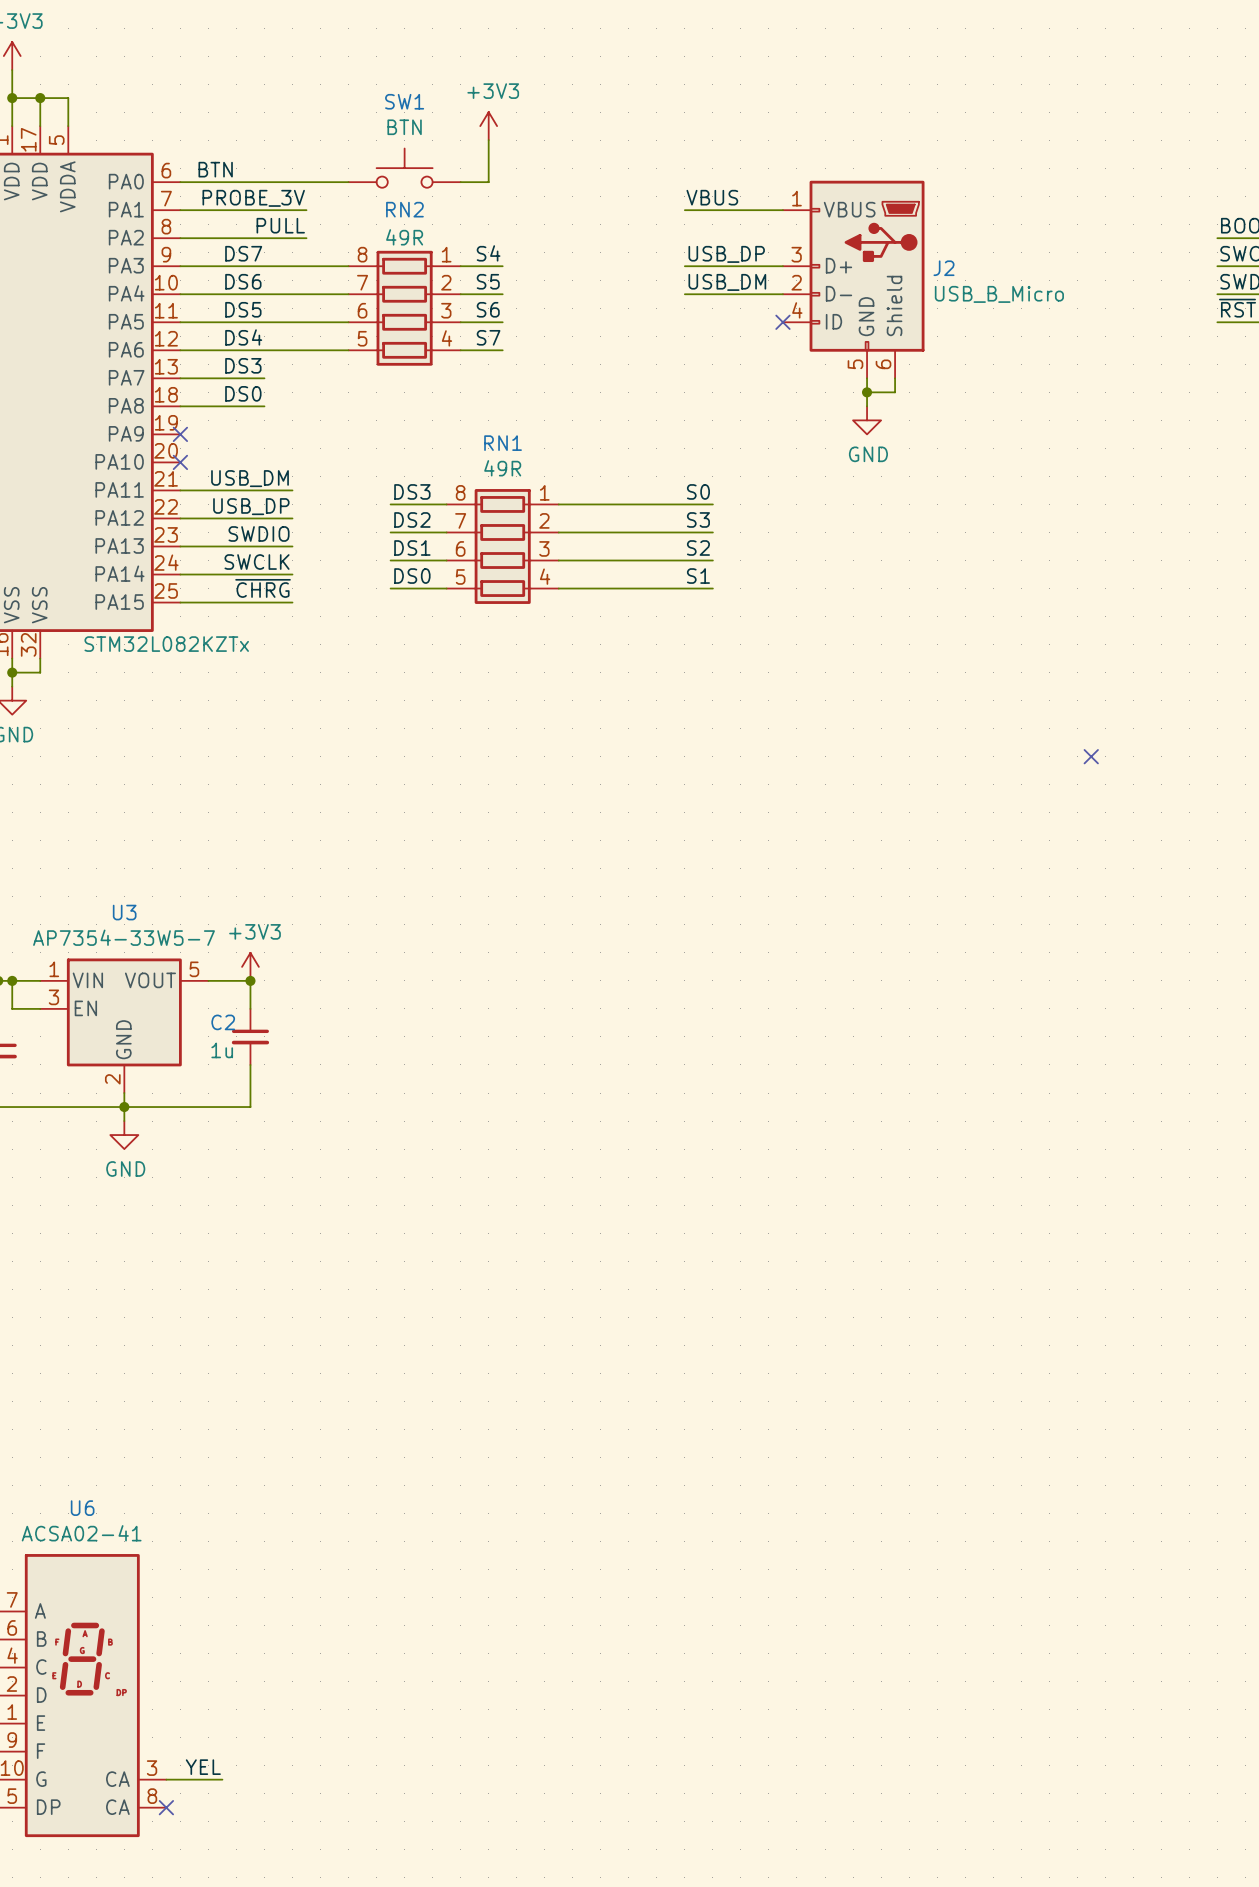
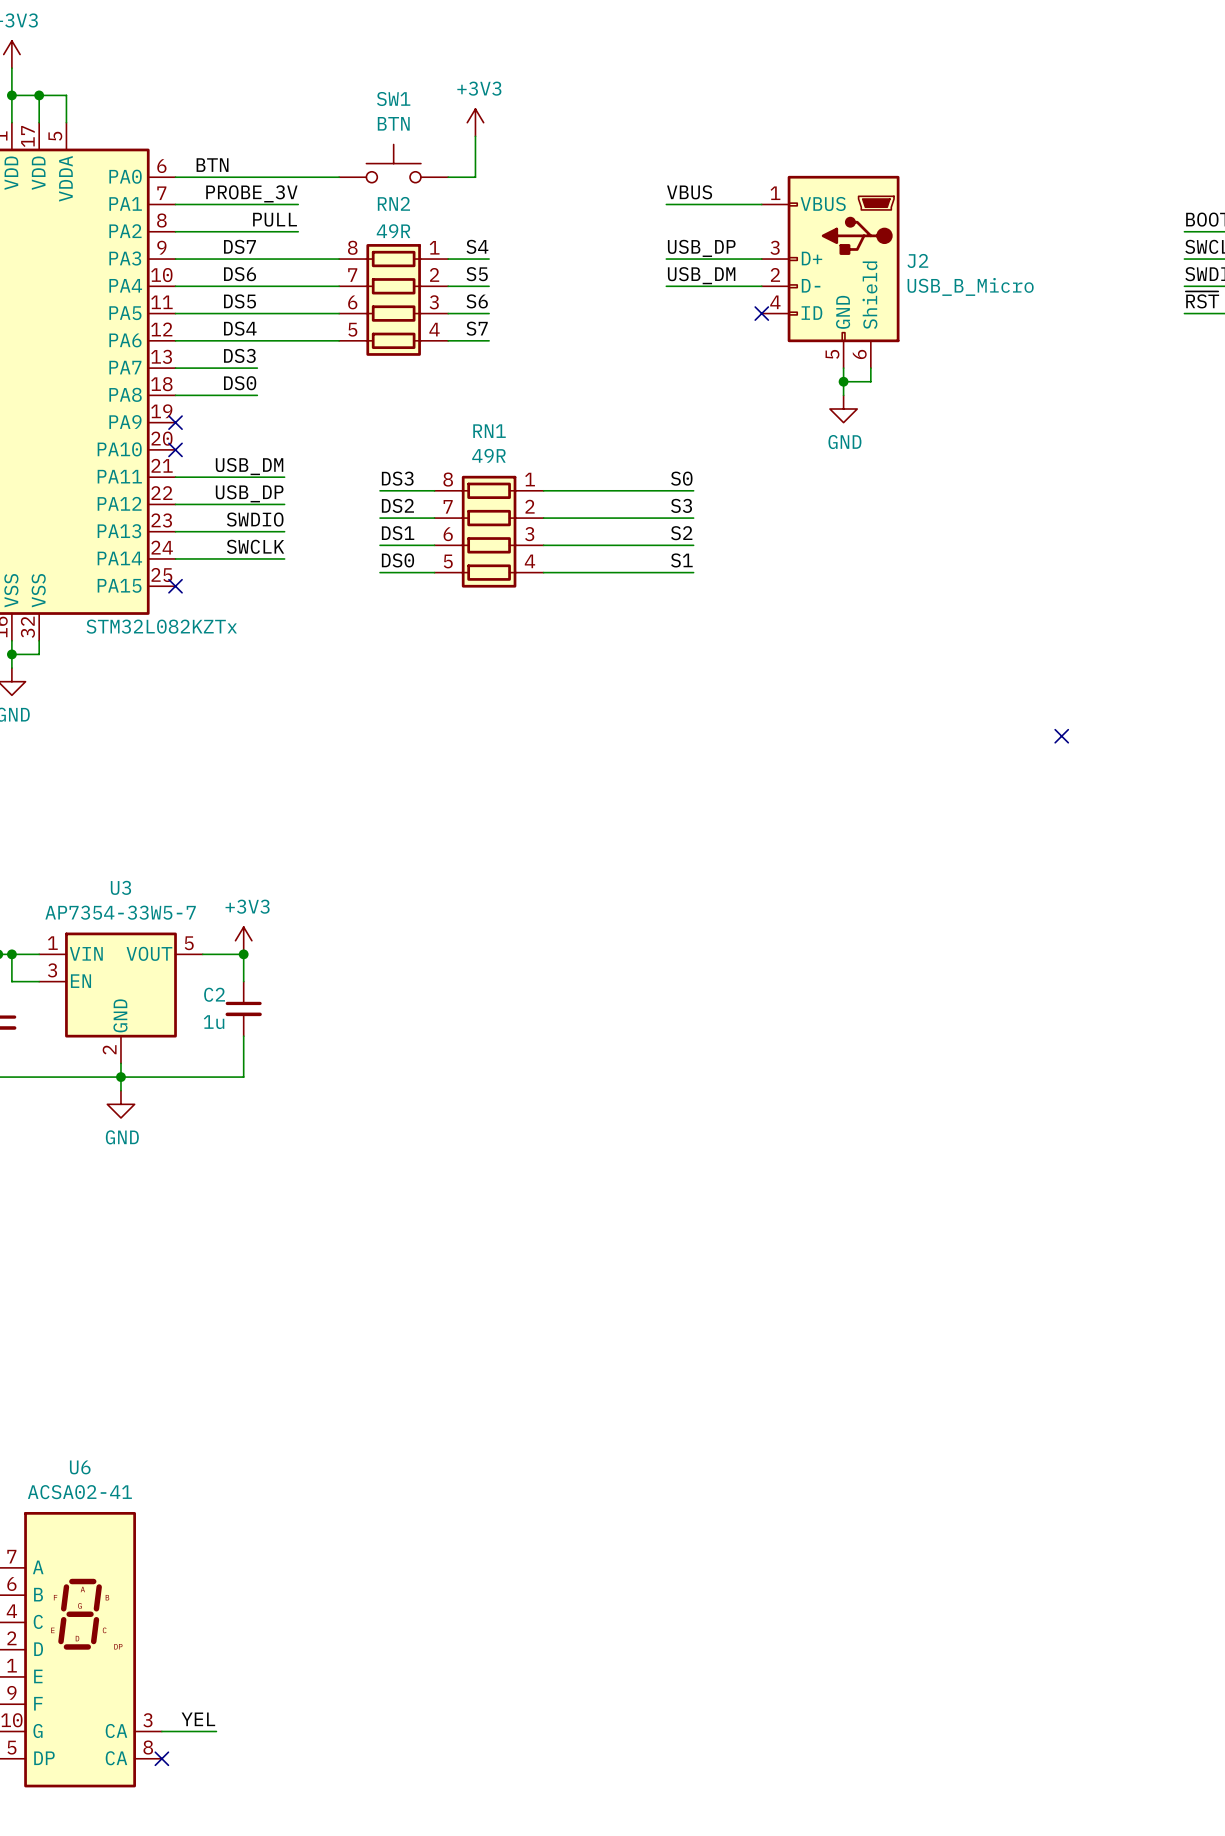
label: ~{CHRG} (263, 588) -> none
wire: (180, 602) (292, 602) -> none
no-connect mark: none -> (175, 586)

